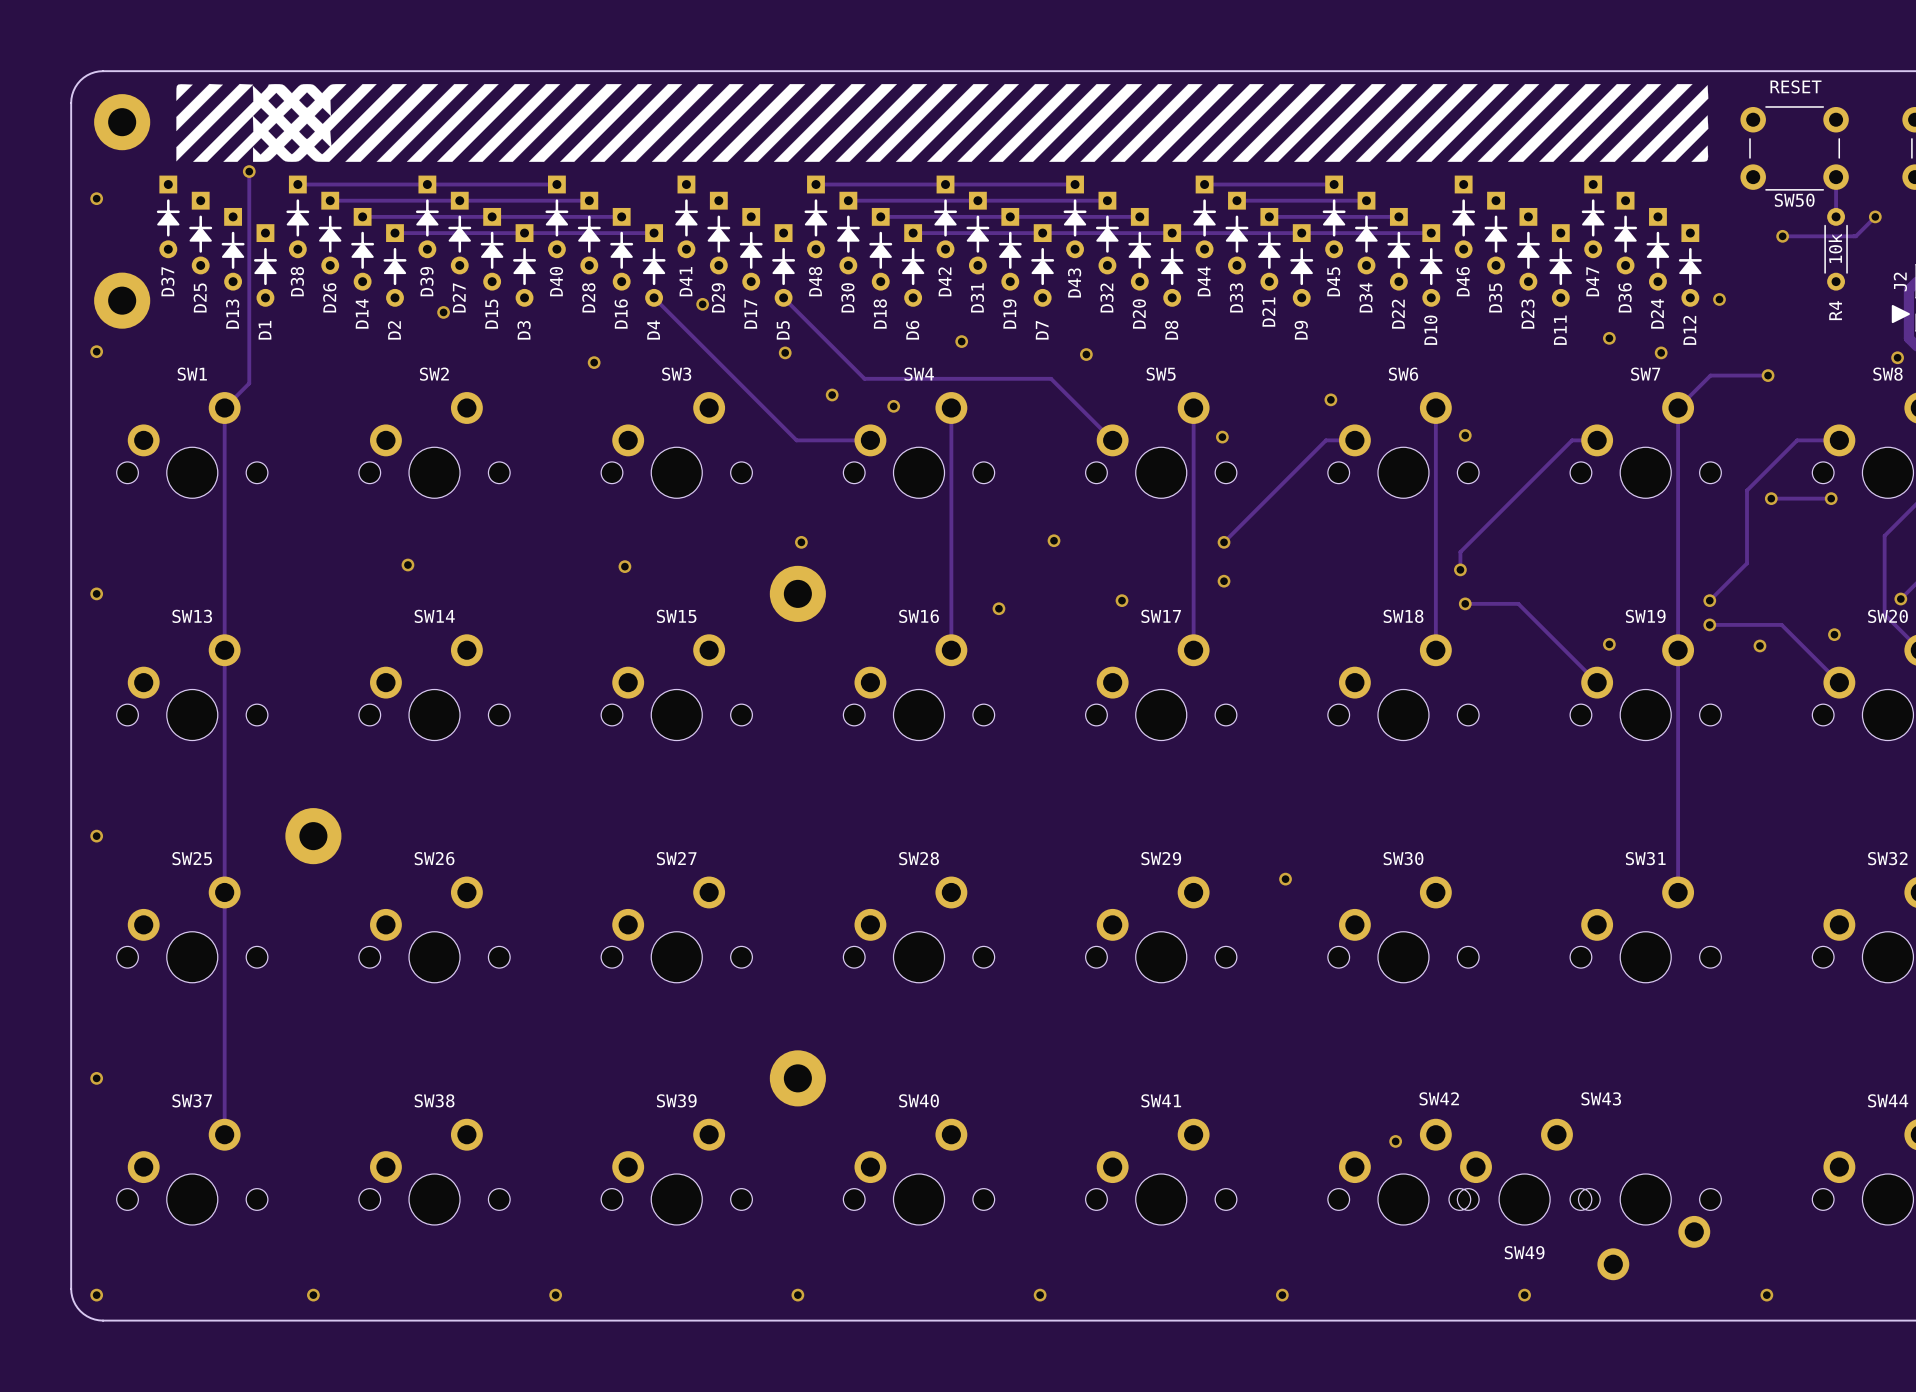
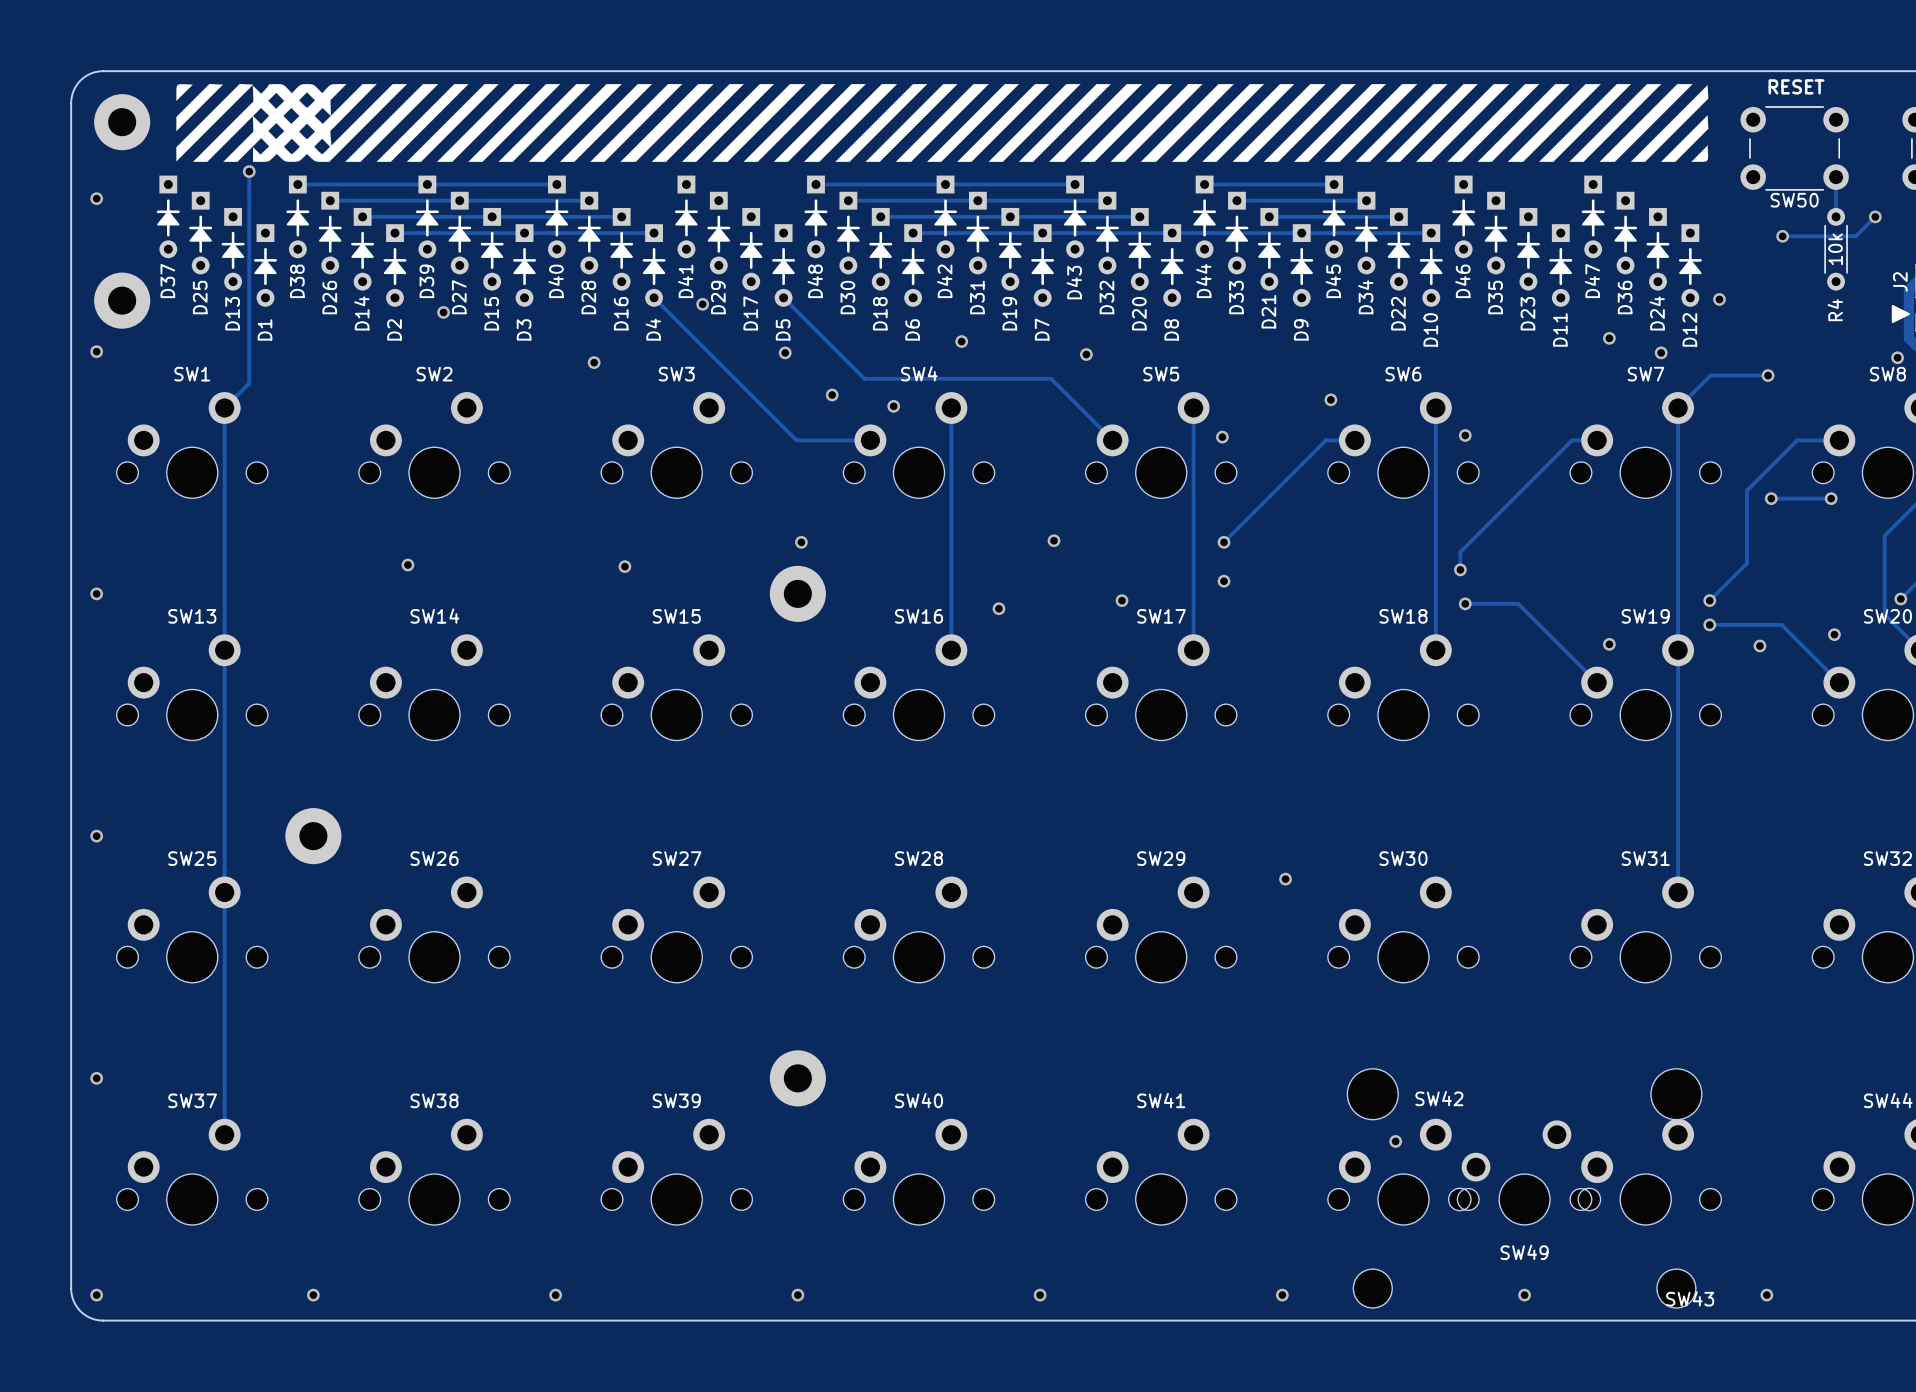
SW49 footprint: [1448, 1118, 1601, 1225] -> [1347, 1068, 1702, 1308]
SW43 rotation: 0° (1645, 1227) -> 180° (1645, 1171)

